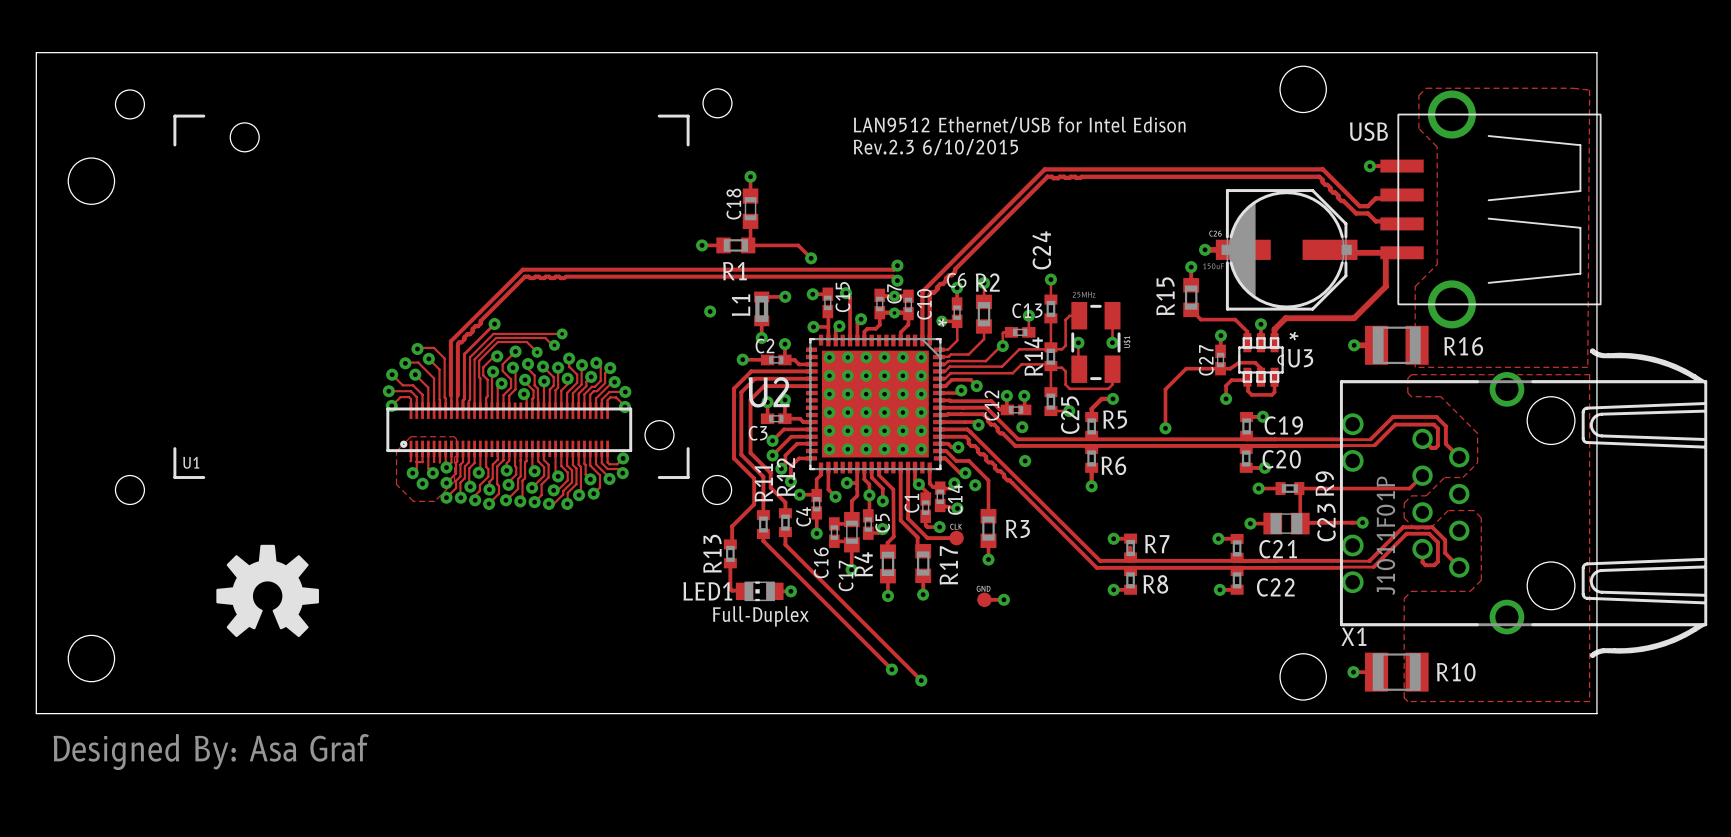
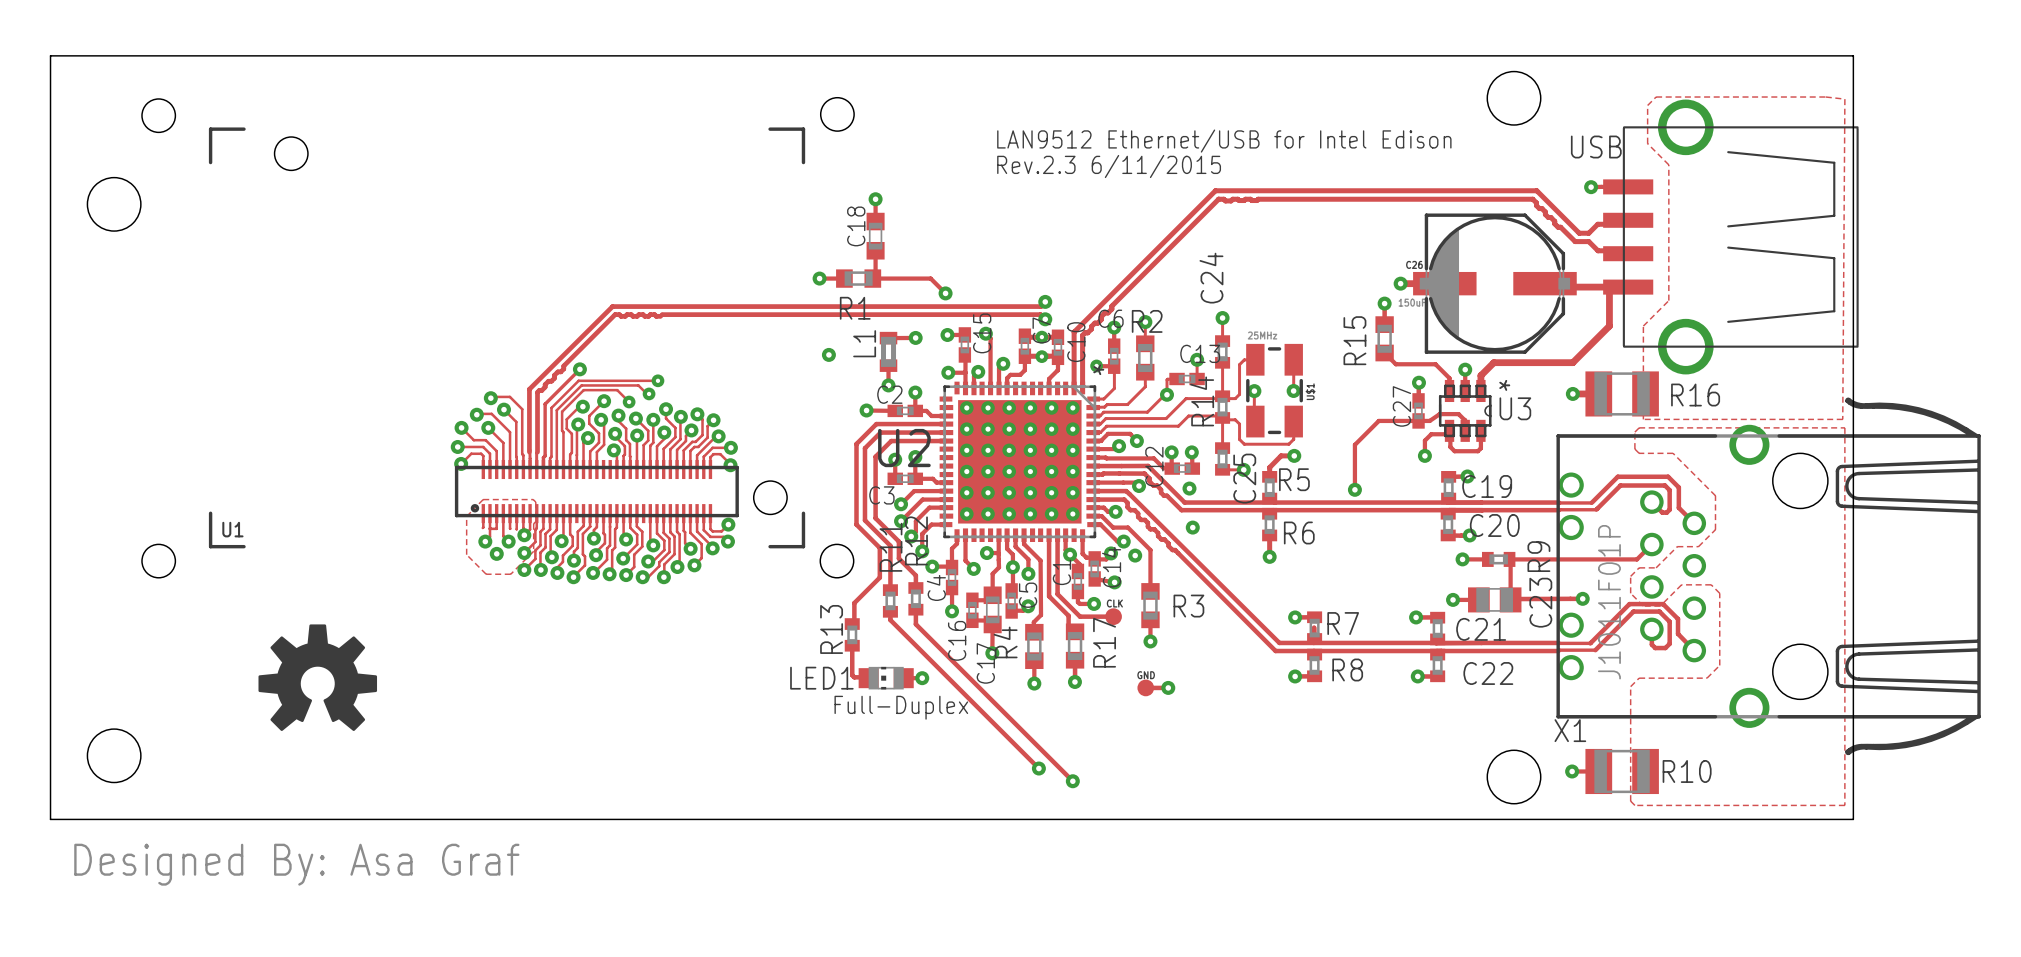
text: Rev.2.3 6/10/2015 (935, 147) -> Rev.2.3 6/11/2015 (1109, 166)

